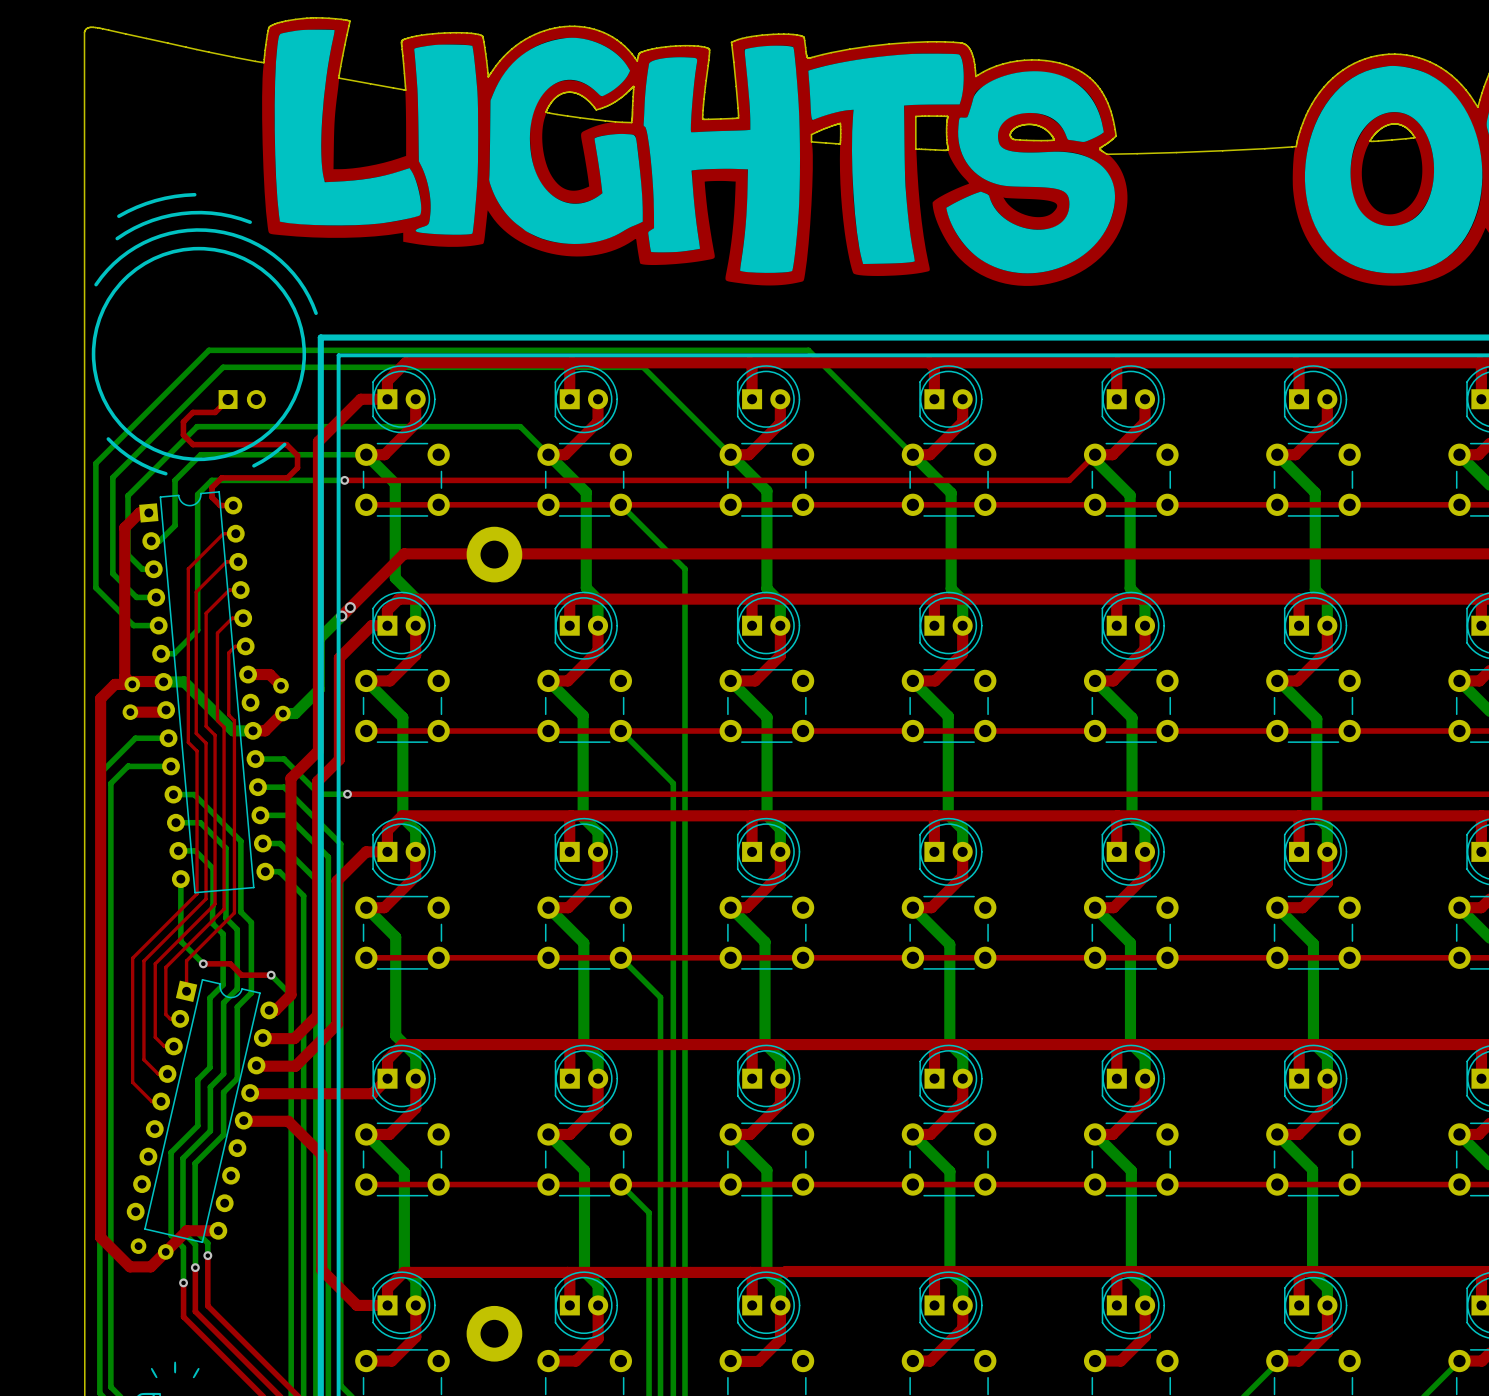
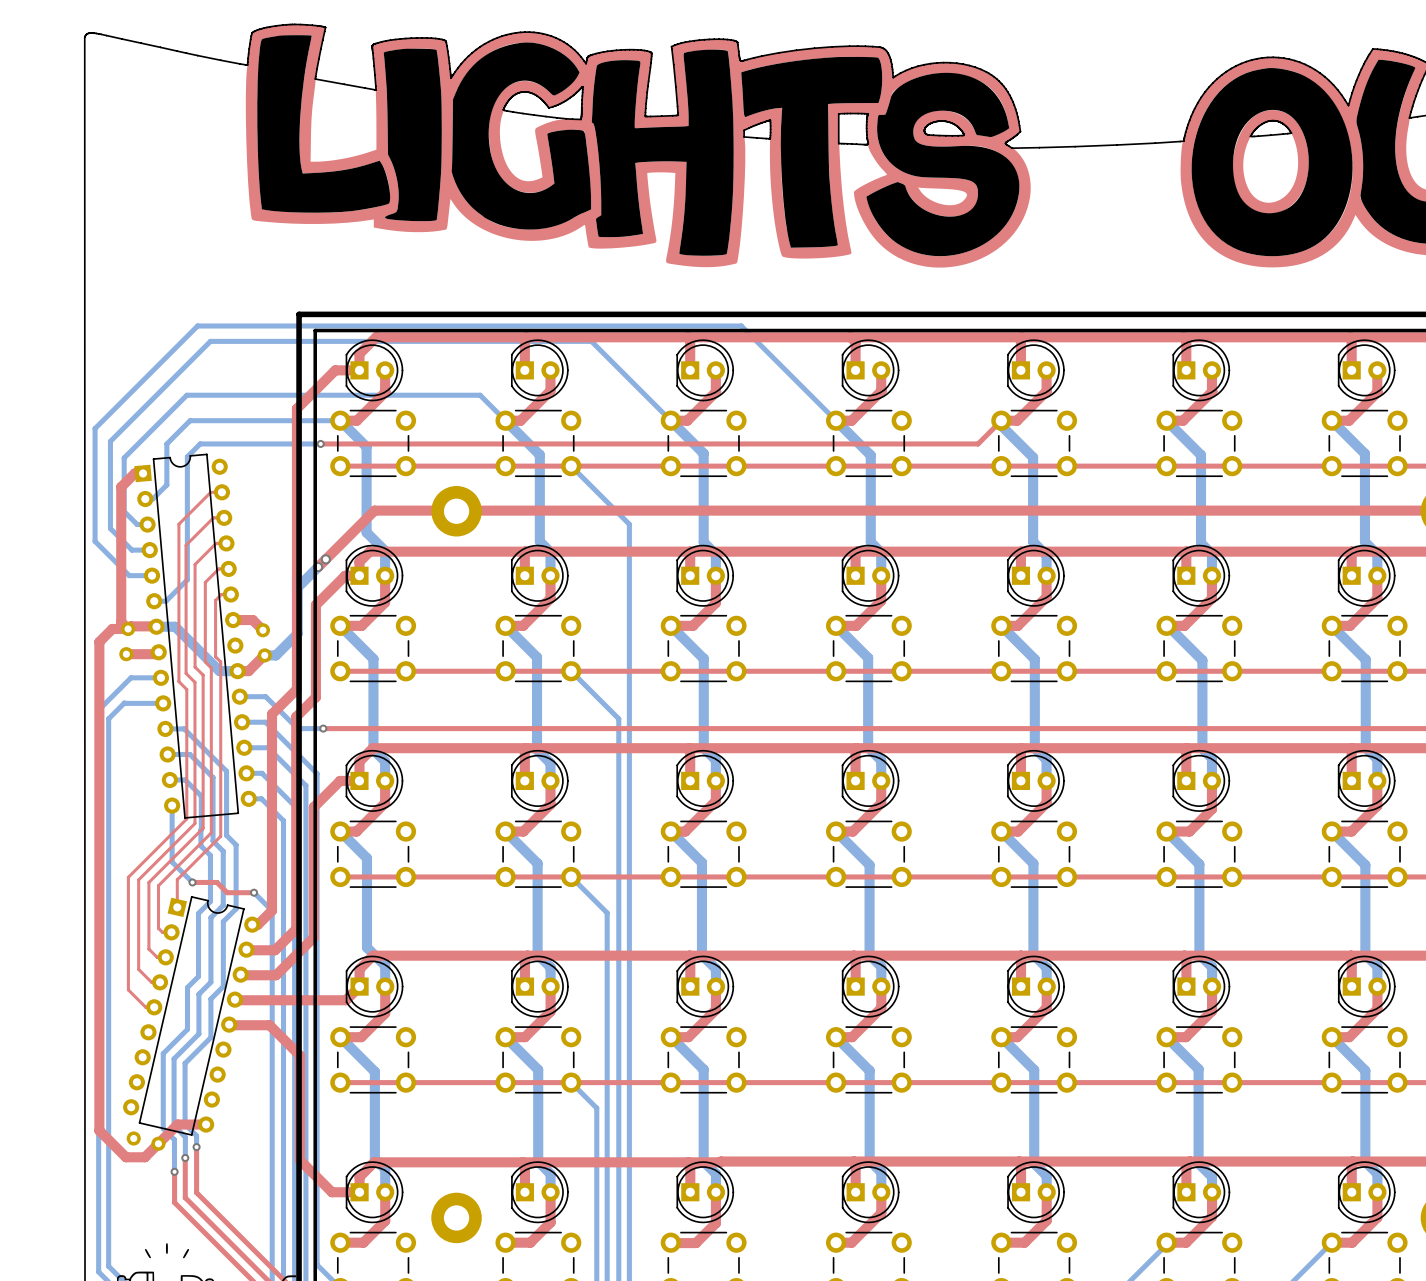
line: (194, 194) (155, 200) (118, 216) -> none
line: (250, 222) (211, 213) (181, 213) (152, 220) (117, 238) -> none
drawing: [91, 246, 307, 462] -> none
line: (96, 284) (120, 257) (152, 239) (178, 231) (214, 230) (249, 240) (280, 260) (304, 288) (316, 313) -> none
top track: (228, 399) (215, 412) (192, 412) (183, 421) (183, 435) (193, 444) (286, 444) (297, 455) (297, 467) (287, 477) (221, 477) (212, 487) (212, 497) (220, 505) (233, 505) -> none
part: (242, 399) -> none
line: (108, 438) (134, 460) (165, 473) -> none
line: (284, 444) (253, 465) -> none

